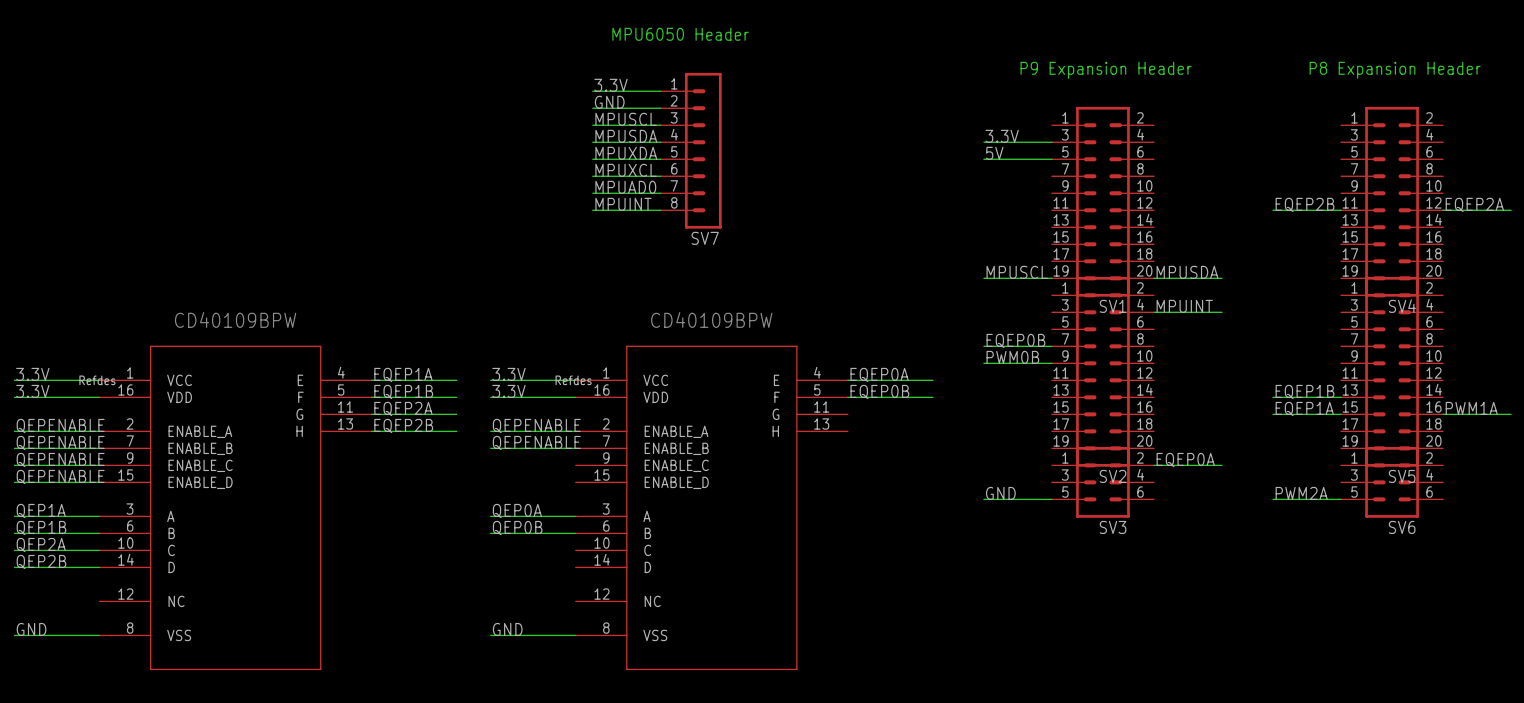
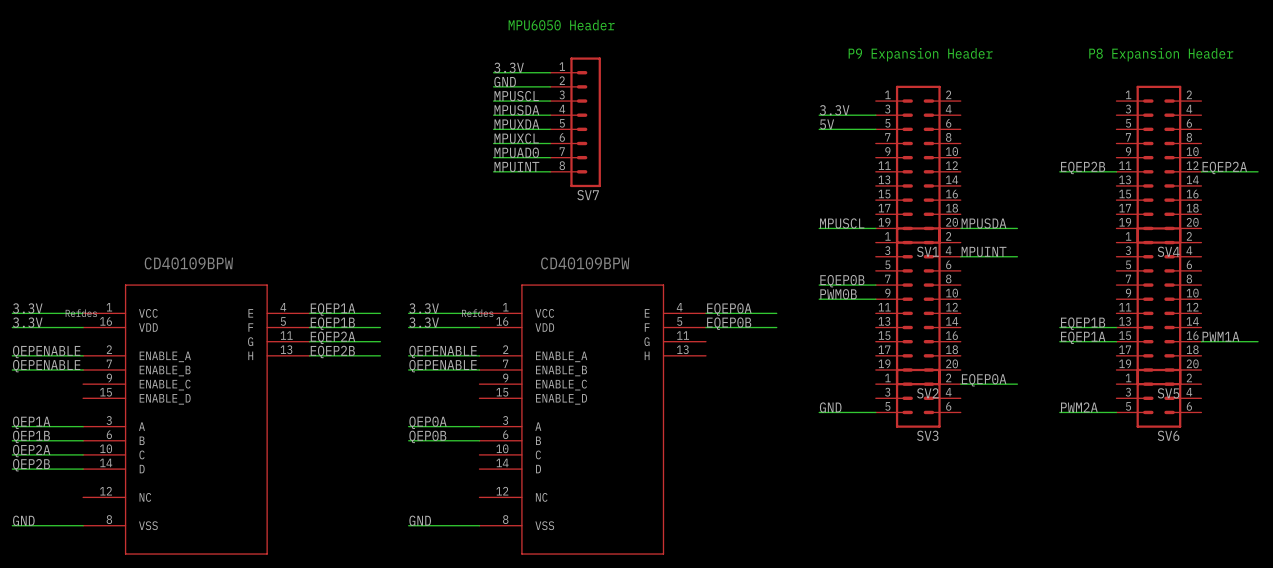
label: QEPENABLE (60, 459) -> none
wire: (14, 465) (99, 465) -> none
label: QEPENABLE (60, 476) -> none
wire: (14, 482) (99, 482) -> none

